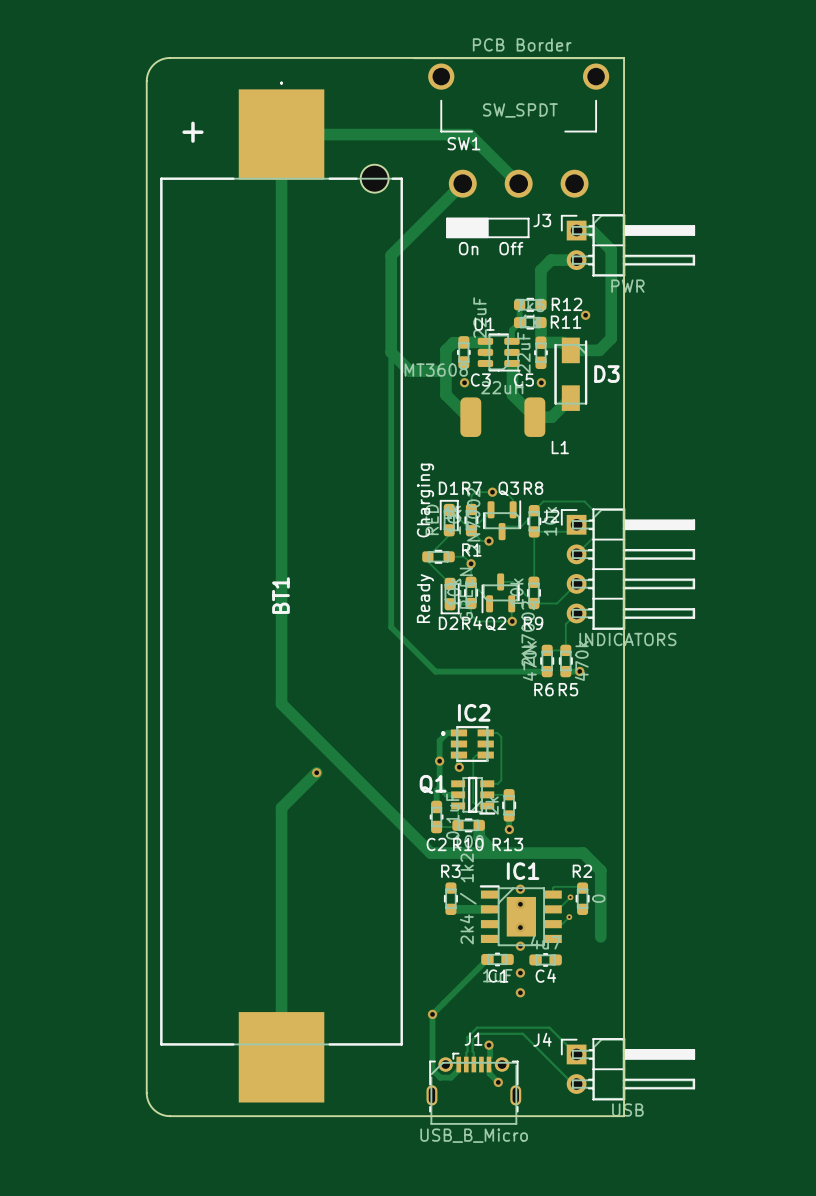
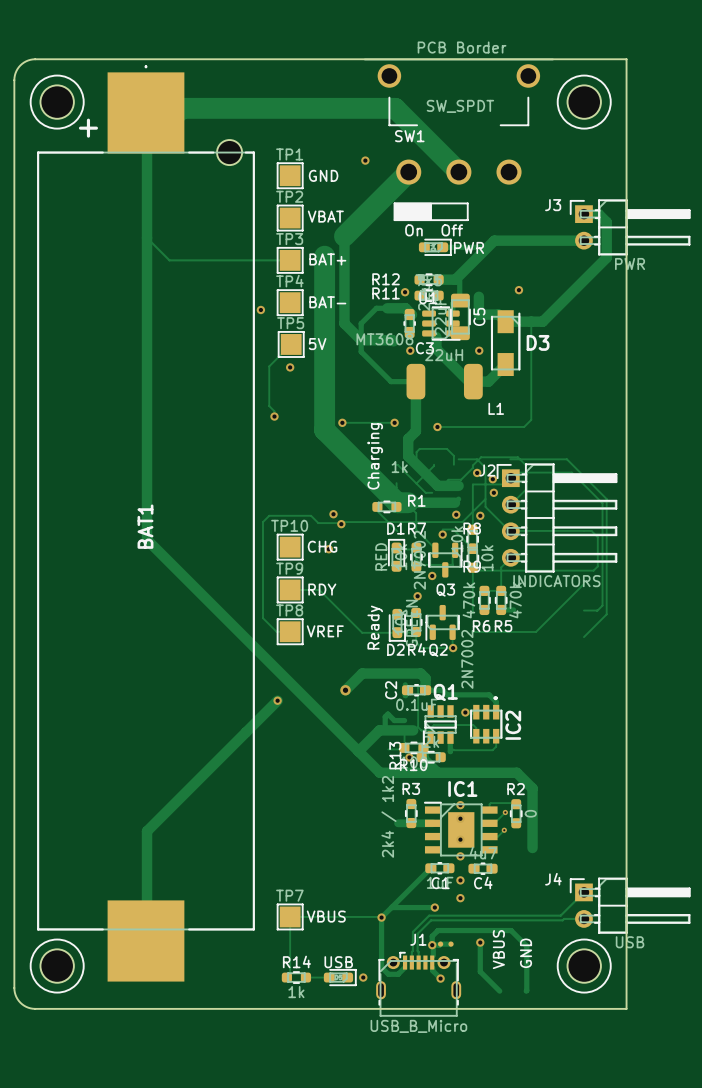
board edge: (170, 57) (162, 59) (153, 64) (149, 71) (146, 81) (146, 1092) (148, 1100) (153, 1109) (162, 1114) (170, 1116) -> (145, 59) (32, 59) (20, 65) (15, 73) (14, 80) (14, 990) (20, 1002) (32, 1008) (145, 1008)
board edge: (624, 57) (624, 1116) -> (553, 59) (626, 59) (626, 1008) (553, 1008)
part: none -> (57, 102)
part: none -> (584, 102)
track: none -> (144, 110) (161, 128) (181, 108) (395, 108) (414, 128)
track: (469, 134) (281, 134) (281, 703) -> (147, 128) (147, 539) (246, 638)
track width: thin (469, 134) (518, 183) -> thick (414, 128) (458, 172)
via: none -> (365, 160)
track width: thin (462, 183) (391, 255) -> thick (408, 172) (344, 236)
TP1: none -> GND (290, 175)
track: (578, 230) (591, 230) (611, 250) (611, 338) (599, 350) -> none
track: none -> (585, 214) (598, 214) (606, 222) (606, 257) (542, 321) (531, 321) (531, 419) (524, 426) (437, 426)
TP2: none -> VBAT (290, 218)
J3 position: (627, 245) -> (630, 227)
track: none -> (147, 237) (169, 260) (290, 260)
track: (558, 260) (551, 260) (540, 270) (540, 304) -> none
track: none -> (510, 240) (583, 240)
part: none -> PWR (435, 247)
track: none -> (442, 247) (487, 247) (494, 240) (455, 279) (438, 279)
track: none -> (324, 256) (324, 430) (397, 502) (455, 502) (458, 499)
TP3: none -> BAT+ (290, 260)
R12 position: (530, 304) -> (429, 279)
R12 name position: R12 (566, 304) -> R12 (385, 279)
via: none -> (405, 292)
R11 position: (530, 322) -> (429, 295)
R11 name position: R11 (566, 322) -> R11 (385, 293)
TP4: none -> BAT- (290, 302)
C5 footprint: [534, 336, 548, 370] -> [450, 293, 471, 341]
via: none -> (260, 309)
track: (485, 351) (485, 341) (453, 342) (445, 350) (445, 394) (468, 417) -> (411, 324) (411, 314) (405, 308) (376, 308) (361, 323) (361, 351) (391, 381) (413, 381)
track: (391, 352) (391, 627) (435, 671) (547, 671) -> none
track: (512, 368) (512, 394) (534, 417) -> (435, 336) (436, 349) (468, 381) (473, 381)
track: none -> (291, 344) (269, 366) (269, 406) (274, 411) (274, 416)
TP5: none -> 5V (291, 344)
C5 name position: C5 (523, 380) -> C5 (479, 316)
via: none -> (290, 367)
track: none -> (415, 381) (415, 431) (408, 439) (408, 456) (437, 485) (458, 485)
via: none -> (274, 416)
track: none -> (342, 422) (394, 422)
via: none -> (342, 422)
via: none -> (394, 422)
Q3 name position: Q3 (508, 488) -> Q3 (445, 590)
via position: (492, 492) -> (437, 426)
track: none -> (458, 459) (477, 459) (485, 467) (485, 506) (509, 530) (591, 530) (597, 537) (597, 566) (593, 570) (475, 570) (472, 567) (472, 612)
track: none -> (510, 459) (566, 459) (606, 499) (606, 614) (583, 637)
D1 position: (449, 518) -> (396, 555)
via: none -> (477, 472)
track: none -> (510, 472) (571, 472) (602, 503) (602, 605) (597, 610) (583, 610)
R7 position: (471, 520) -> (416, 557)
Q3 position: (502, 520) -> (445, 559)
R8 position: (534, 521) -> (472, 558)
via: none -> (492, 479)
via: (488, 541) -> none
via: none -> (493, 492)
track: none -> (485, 499) (462, 522) (343, 522) (341, 524) (318, 523) (311, 515) (269, 515) (262, 522) (262, 618) (276, 631) (290, 631)
via: (471, 563) -> none
via: none -> (333, 514)
via: none -> (456, 514)
via: none -> (480, 515)
BAT1: none -> (145, 523)
via: none -> (341, 524)
track: (576, 583) (557, 603) (533, 603) -> none
via: none -> (442, 534)
BT1: (281, 592) -> none
R4 position: (471, 592) -> (416, 622)
Q2 position: (500, 593) -> (442, 622)
D2 position: (450, 595) -> (397, 625)
text position: Ready (425, 598) -> Ready (375, 627)
TP10: none -> CHG (290, 547)
via: none -> (328, 549)
via: (512, 621) -> none
via: none -> (432, 575)
track: none -> (583, 584) (536, 631) (472, 631)
track: none -> (290, 589) (319, 589) (362, 632) (416, 631) (416, 642) (421, 648) (453, 648) (452, 632)
TP9: none -> RDY (290, 589)
via: none -> (417, 596)
via: (579, 671) -> none
TP8: none -> VREF (290, 631)
via: none -> (453, 648)
track: (458, 732) (447, 732) (439, 740) (439, 787) -> none
track: (486, 732) (497, 732) (501, 736) (501, 780) (497, 783) (487, 783) -> none
Q1 rotation: 0° (467, 743) -> 90° clockwise (486, 719)
Q1 position: (467, 743) -> (486, 719)
track: none -> (345, 690) (362, 673) (420, 673) (425, 678) (425, 690) (442, 690) (447, 694) (489, 694) (496, 701) (496, 712)
via: none -> (345, 690)
via: (439, 761) -> none
via: (459, 767) -> none
via: none -> (465, 712)
IC2 rotation: 0° (473, 795) -> 90° clockwise (439, 725)
track: none -> (413, 730) (379, 730) (358, 751)
R13 rotation: 0° (509, 805) -> 90° clockwise (431, 757)
R13 position: (509, 805) -> (431, 757)
track: (281, 807) (281, 1057) -> (246, 732) (147, 831) (147, 956)
track: none -> (476, 736) (476, 728) (473, 725) (433, 725) (430, 728) (430, 737)
track: none -> (496, 736) (496, 746) (492, 750) (453, 750) (450, 747) (450, 737)
C2 rotation: 0° (436, 816) -> 90° clockwise (416, 690)
C2 position: (436, 816) -> (416, 690)
via: (509, 829) -> none
via: none -> (409, 757)
R3 position: (450, 898) -> (411, 813)
R3 value position: 2k4 / 1k2 (468, 898) -> 2k4 / 1k2 (388, 816)
track: none -> (392, 907) (434, 907)
via: none -> (434, 907)
TP7: none -> VBUS (290, 916)
track: none -> (381, 917) (290, 916) (290, 974) (286, 977)
track: (467, 1037) (477, 1027) (549, 1027) (576, 1054) -> (412, 938) (412, 931) (429, 915) (560, 915) (583, 892)
track: (472, 1039) (478, 1033) (522, 1033) (573, 1084) (576, 1084) -> (417, 940) (417, 933) (431, 920) (583, 918)
track: none -> (480, 942) (480, 971) (499, 991)
via: none -> (480, 942)
track: none -> (440, 944) (432, 945) (432, 936) (437, 930) (511, 930) (526, 946) (526, 991)
part: none -> (445, 944)
text: none -> VBUS (498, 949)
text: none -> GND (526, 953)
part: none -> (57, 966)
part: none -> (584, 966)
J4 position: (627, 1069) -> (630, 905)
R14: none -> 1k (296, 977)
track: none -> (305, 977) (329, 977)
part: none -> USB (340, 977)
via: none -> (363, 977)

